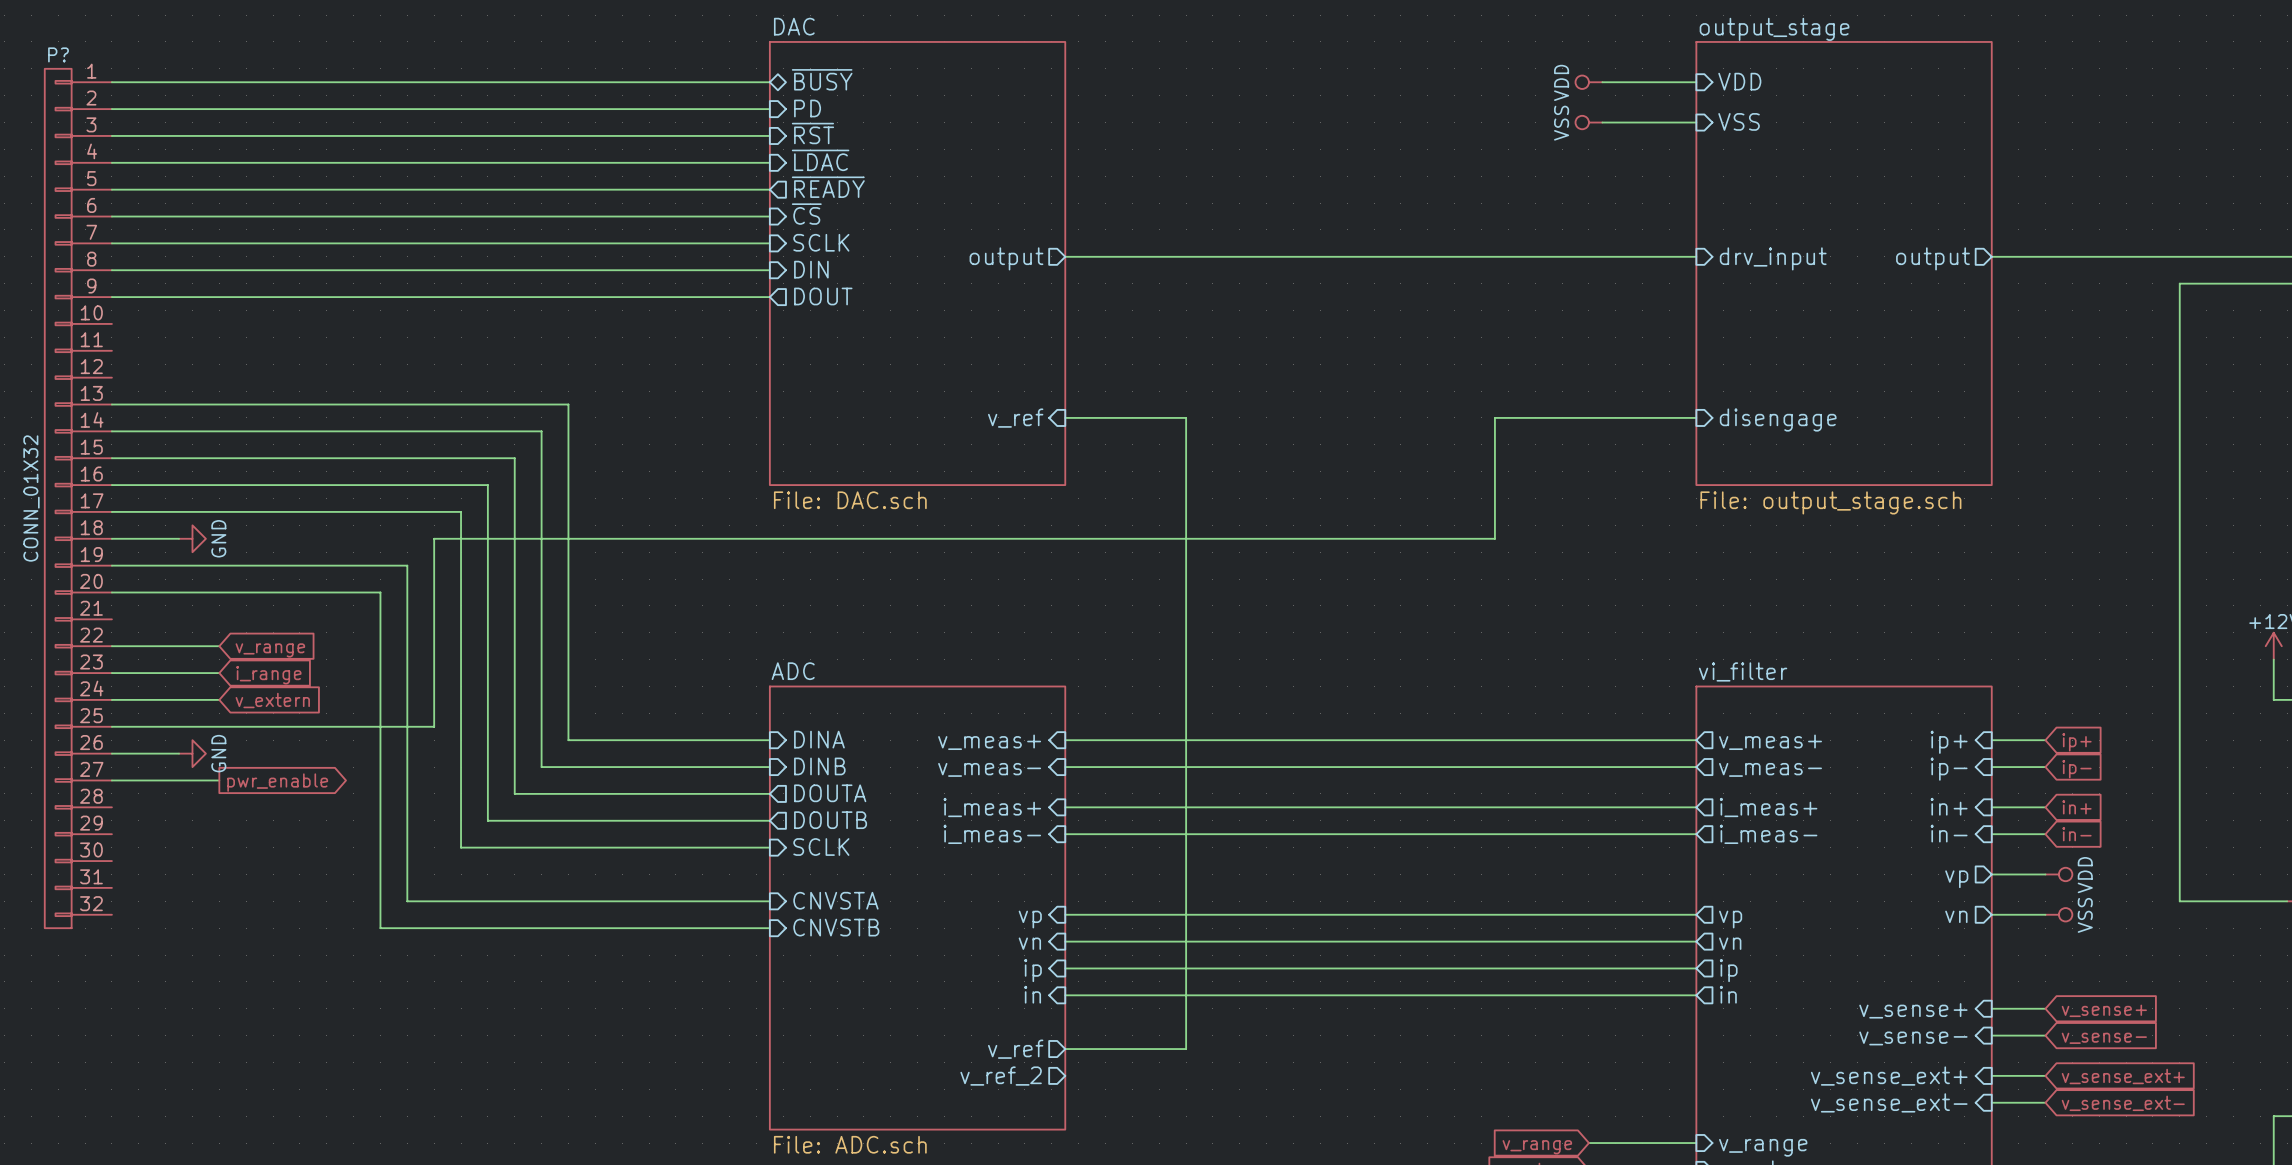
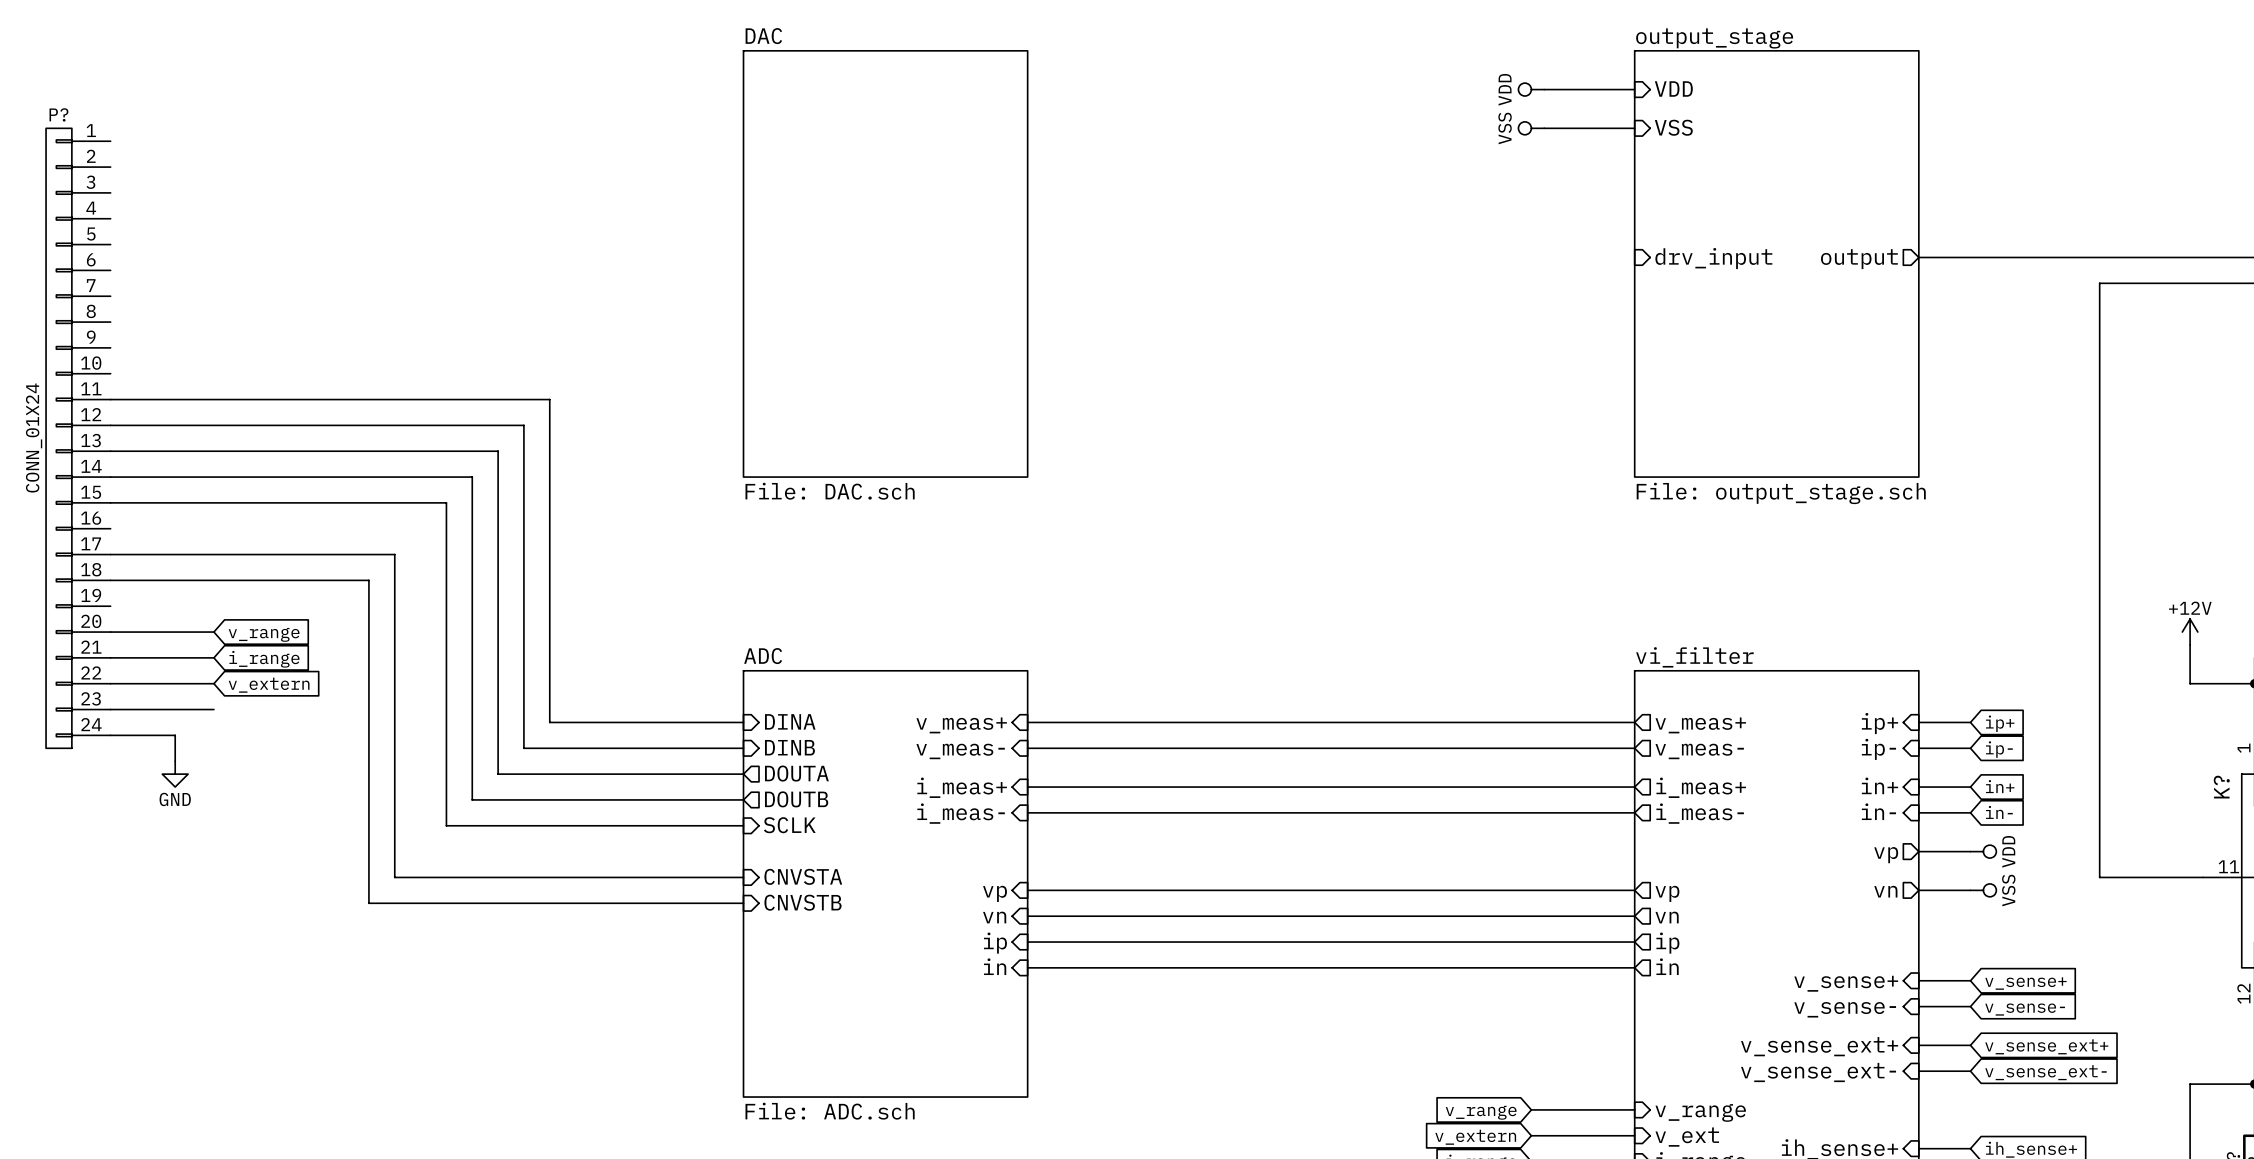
sheet pin: ~{BUSY} (822, 79) -> none
wire: (111, 82) (769, 82) -> none
sheet pin: PD (807, 108) -> none
wire: (111, 109) (769, 109) -> none
sheet pin: ~{RST} (812, 133) -> none
wire: (111, 135) (769, 135) -> none
sheet pin: ~{LDAC} (820, 160) -> none
wire: (111, 162) (769, 162) -> none
sheet pin: ~{READY} (828, 187) -> none
wire: (111, 189) (769, 189) -> none
sheet pin: ~{CS} (806, 214) -> none
wire: (111, 216) (769, 216) -> none
sheet pin: SCLK (821, 242) -> none
wire: (111, 243) (769, 243) -> none
wire: (1065, 256) (1696, 256) -> none
sheet pin: output (1006, 258) -> none
sheet pin: DIN (811, 269) -> none
wire: (111, 270) (769, 270) -> none
sheet pin: DOUT (823, 296) -> none
wire: (111, 297) (769, 297) -> none
wire: (1065, 417) (1186, 417) (1186, 1049) (1065, 1049) -> none
wire: (1696, 417) (1494, 417) (1494, 538) (434, 538) (434, 726) (219, 726) -> none
sheet pin: v_ref (1015, 418) -> none
sheet pin: disengage (1778, 420) -> none
P?: none -> CONN_01X24 (78, 438)
P?: CONN_01X32 (78, 498) -> none
wire: (111, 538) (179, 538) -> none
power symbol: GND (192, 538) -> none
wire: none -> (175, 735) (175, 761)
power symbol rotation: 0° (192, 753) -> 90° clockwise (175, 774)
power symbol position: GND (192, 753) -> GND (175, 774)
wire: (111, 780) (219, 780) -> none
global label: pwr_enable (277, 782) -> none
sheet pin: v_ref (1015, 1049) -> none
sheet pin: v_ref_2 (1001, 1076) -> none

